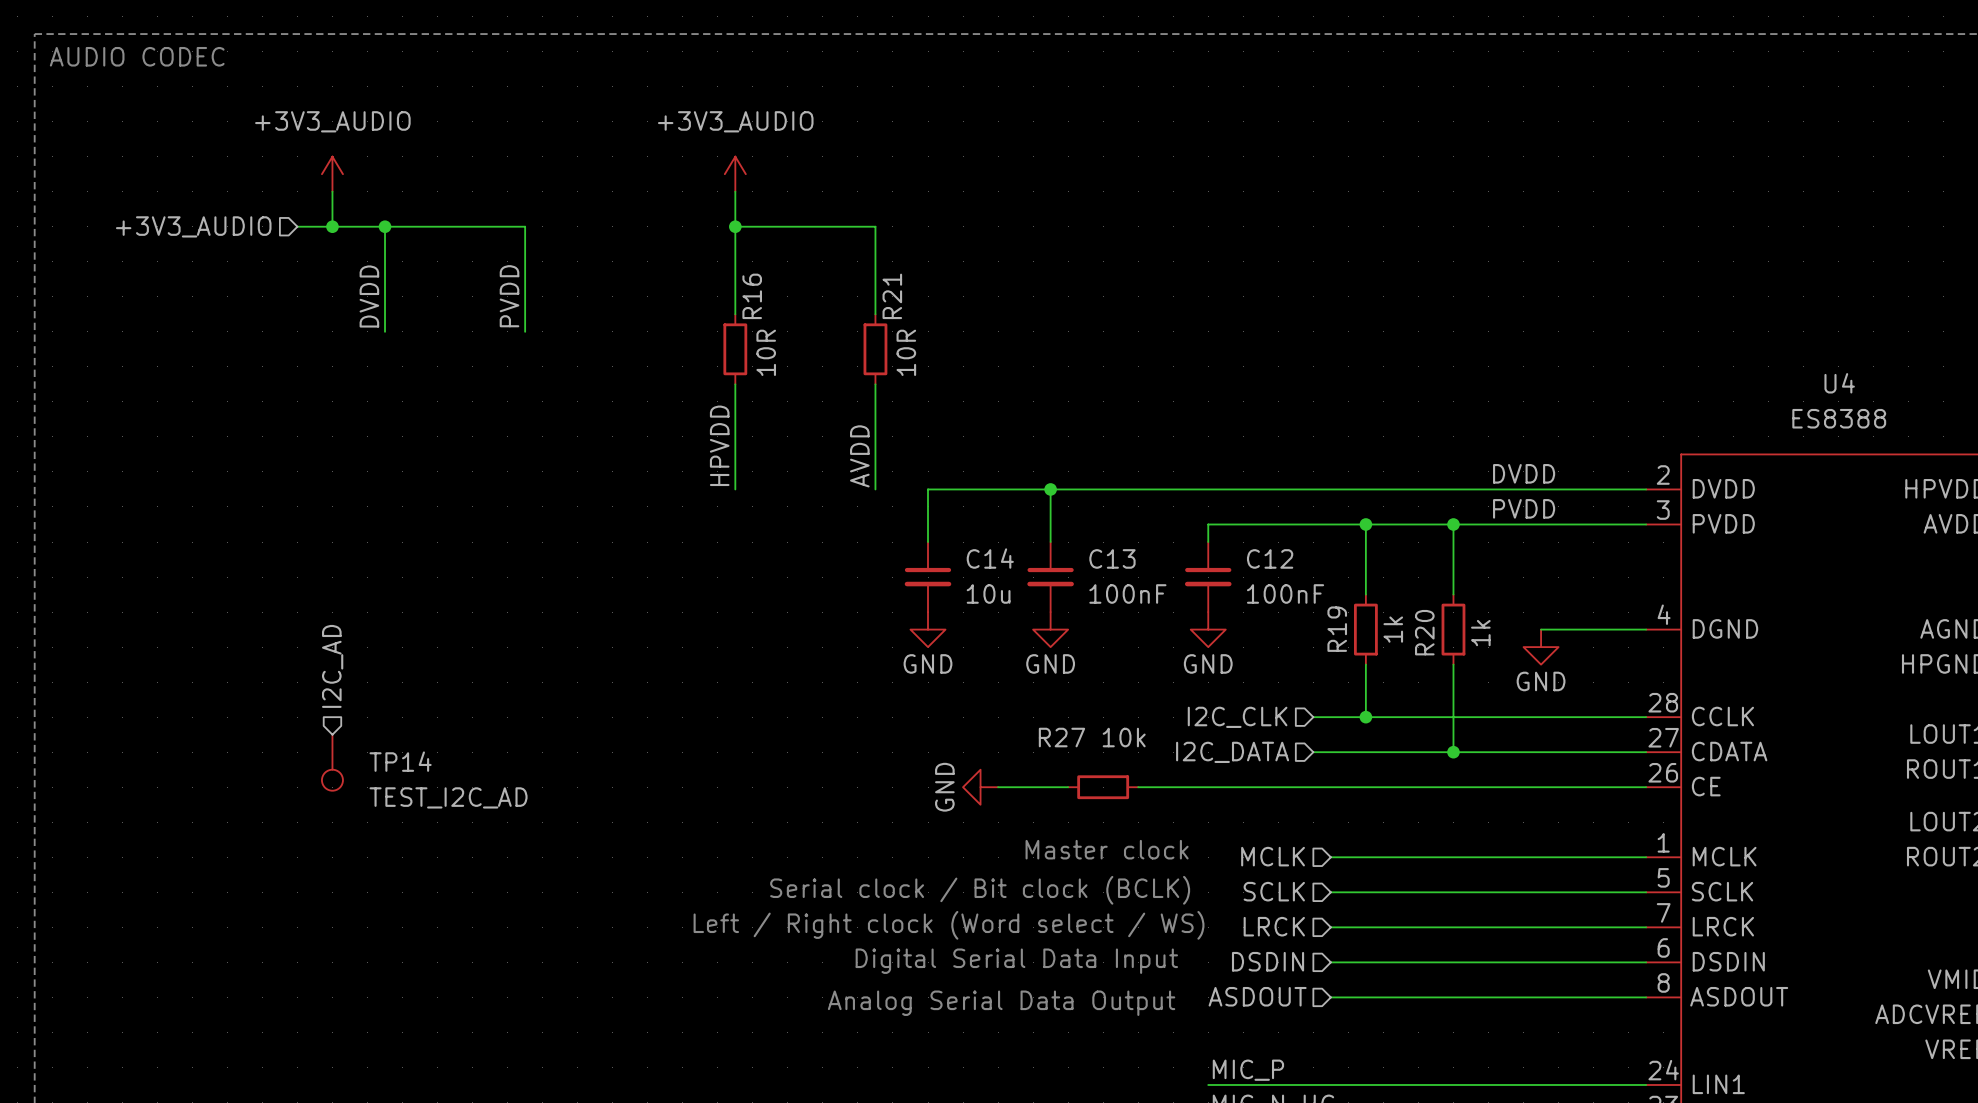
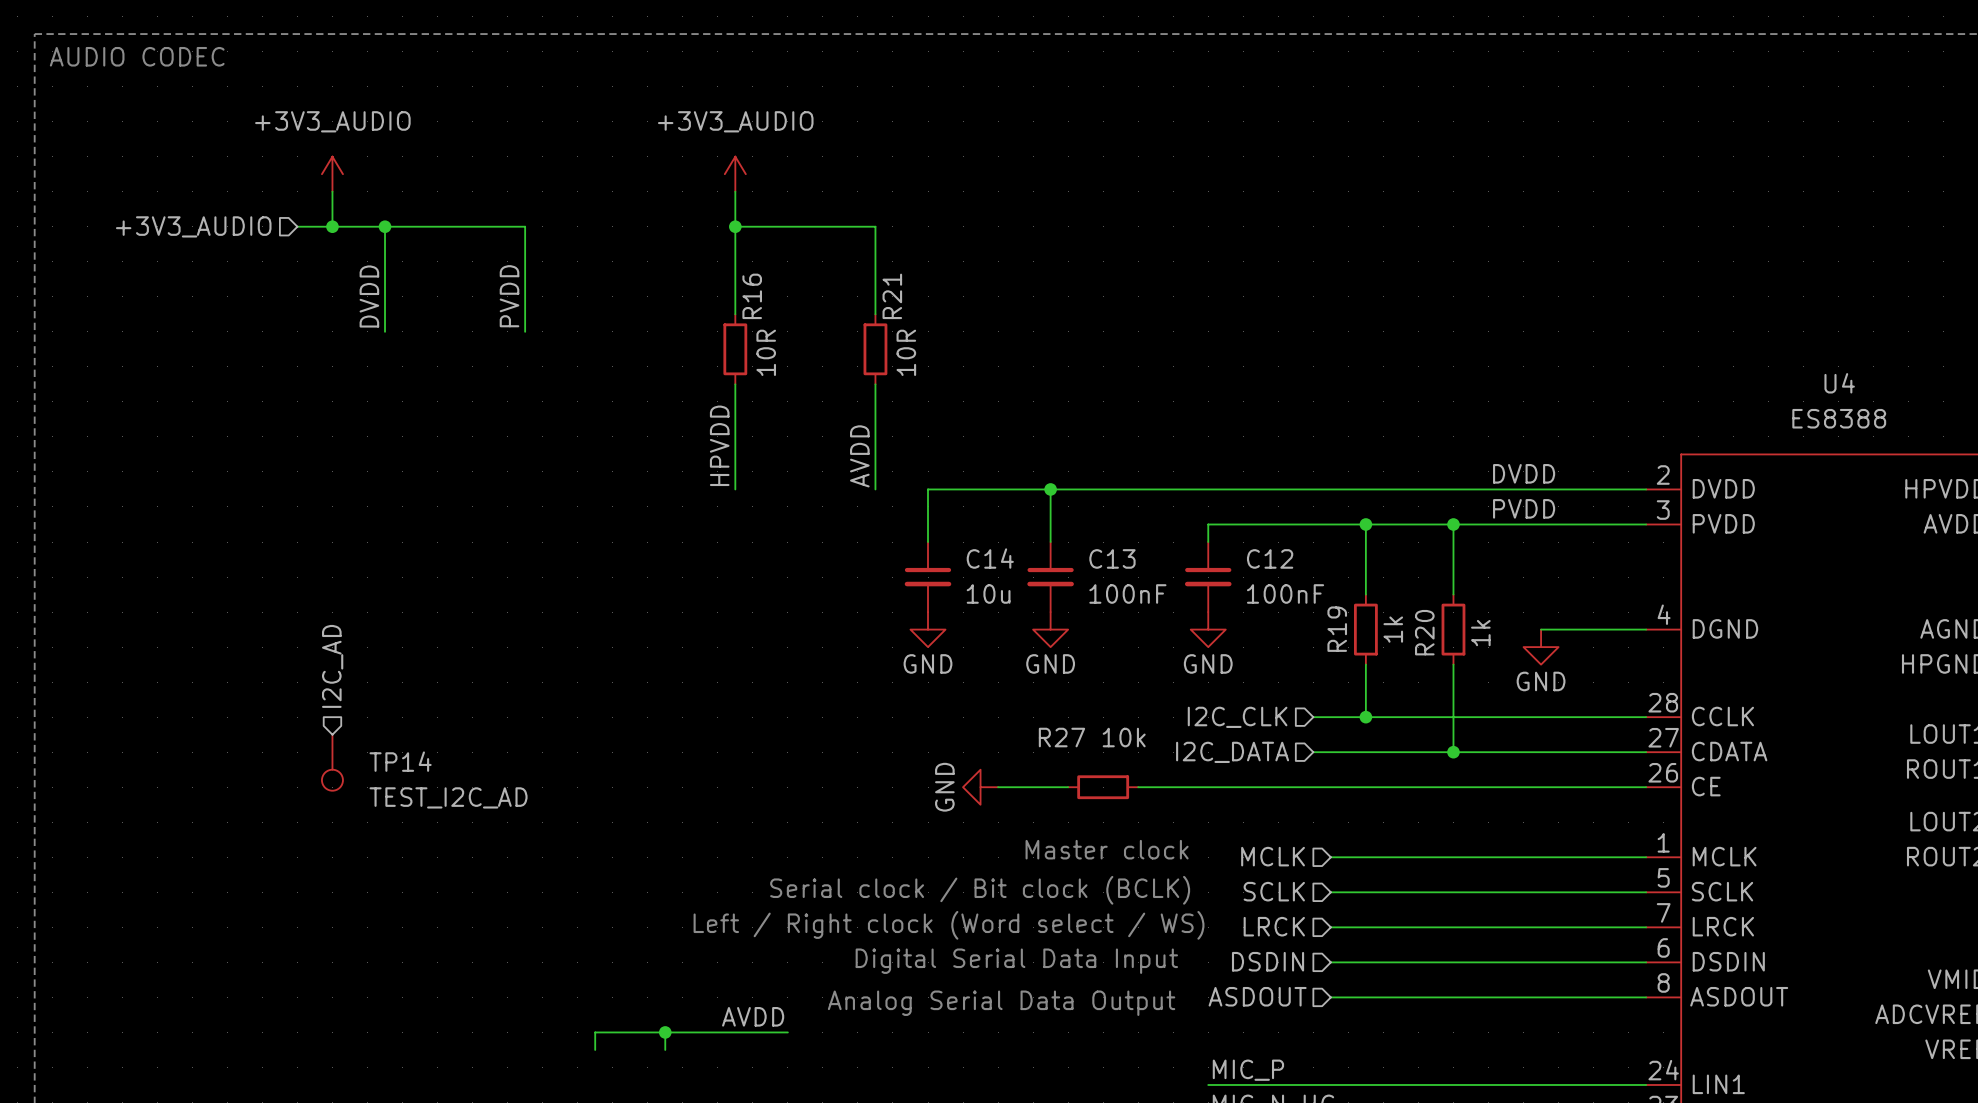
label: none -> AVDD (753, 1016)
wire: none -> (665, 1032) (665, 1049)
junction: none -> (665, 1032)
wire: none -> (787, 1032) (595, 1032) (595, 1049)

